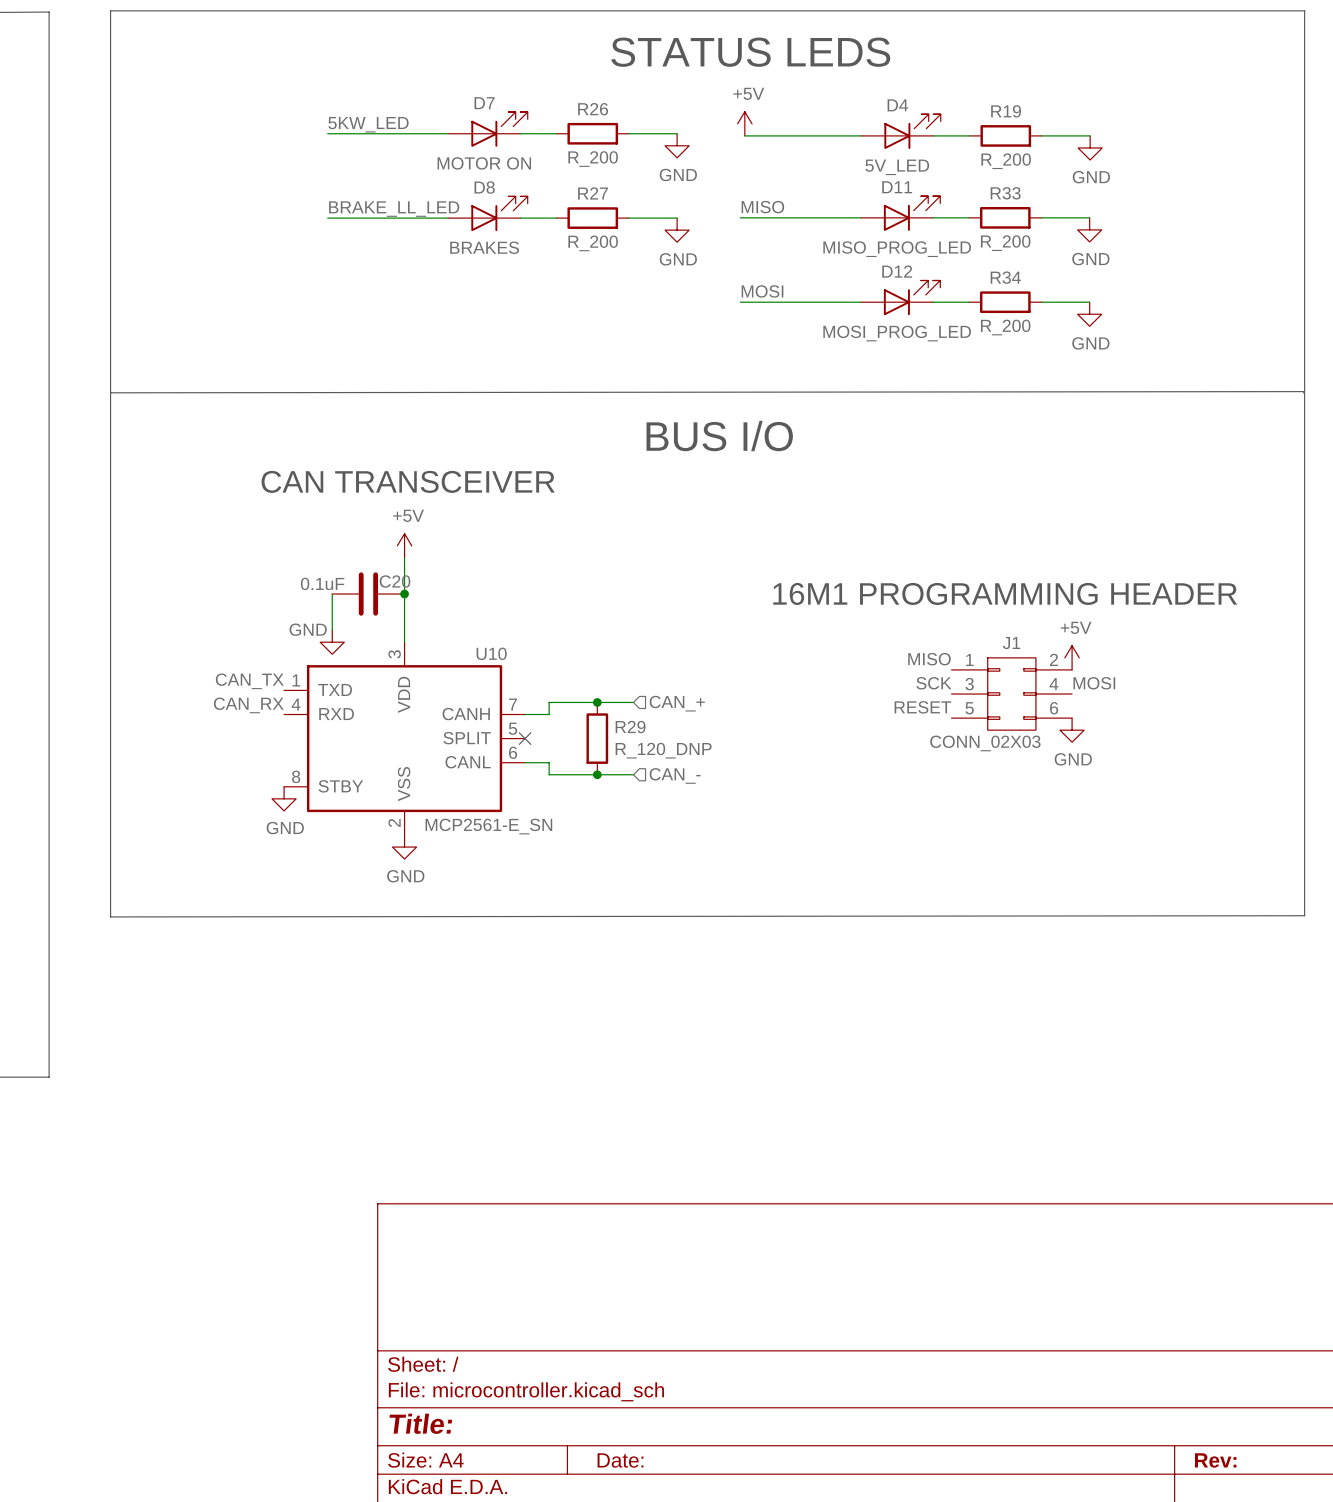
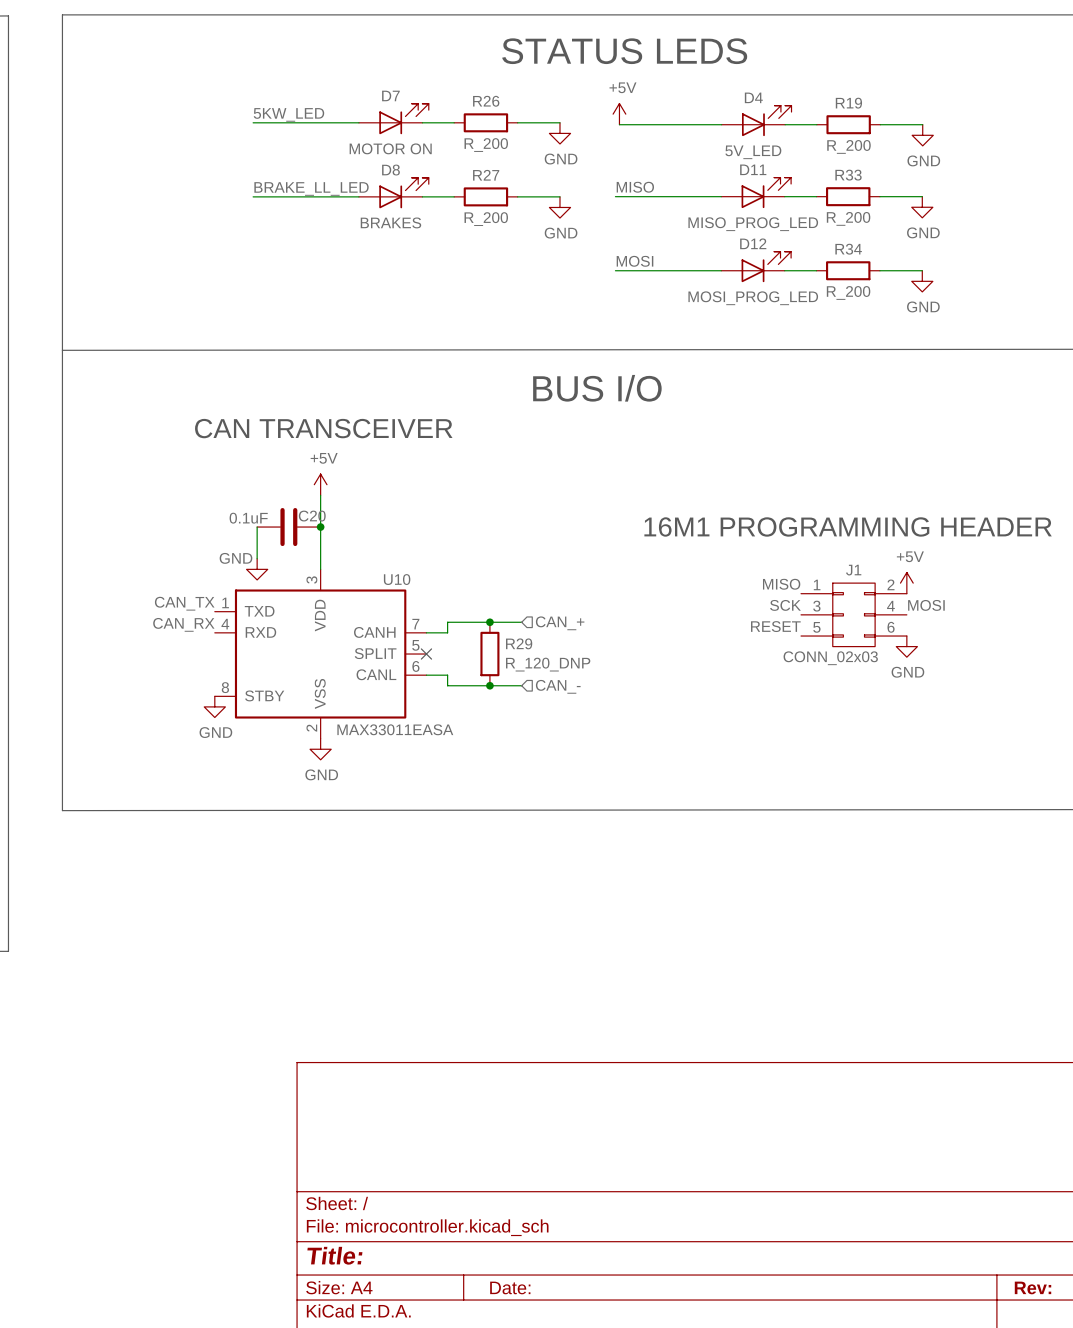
J1 value: CONN_02X03 (985, 743) -> CONN_02x03 (830, 658)
U10 value: MCP2561-E_SN (488, 826) -> MAX33011EASA (395, 729)

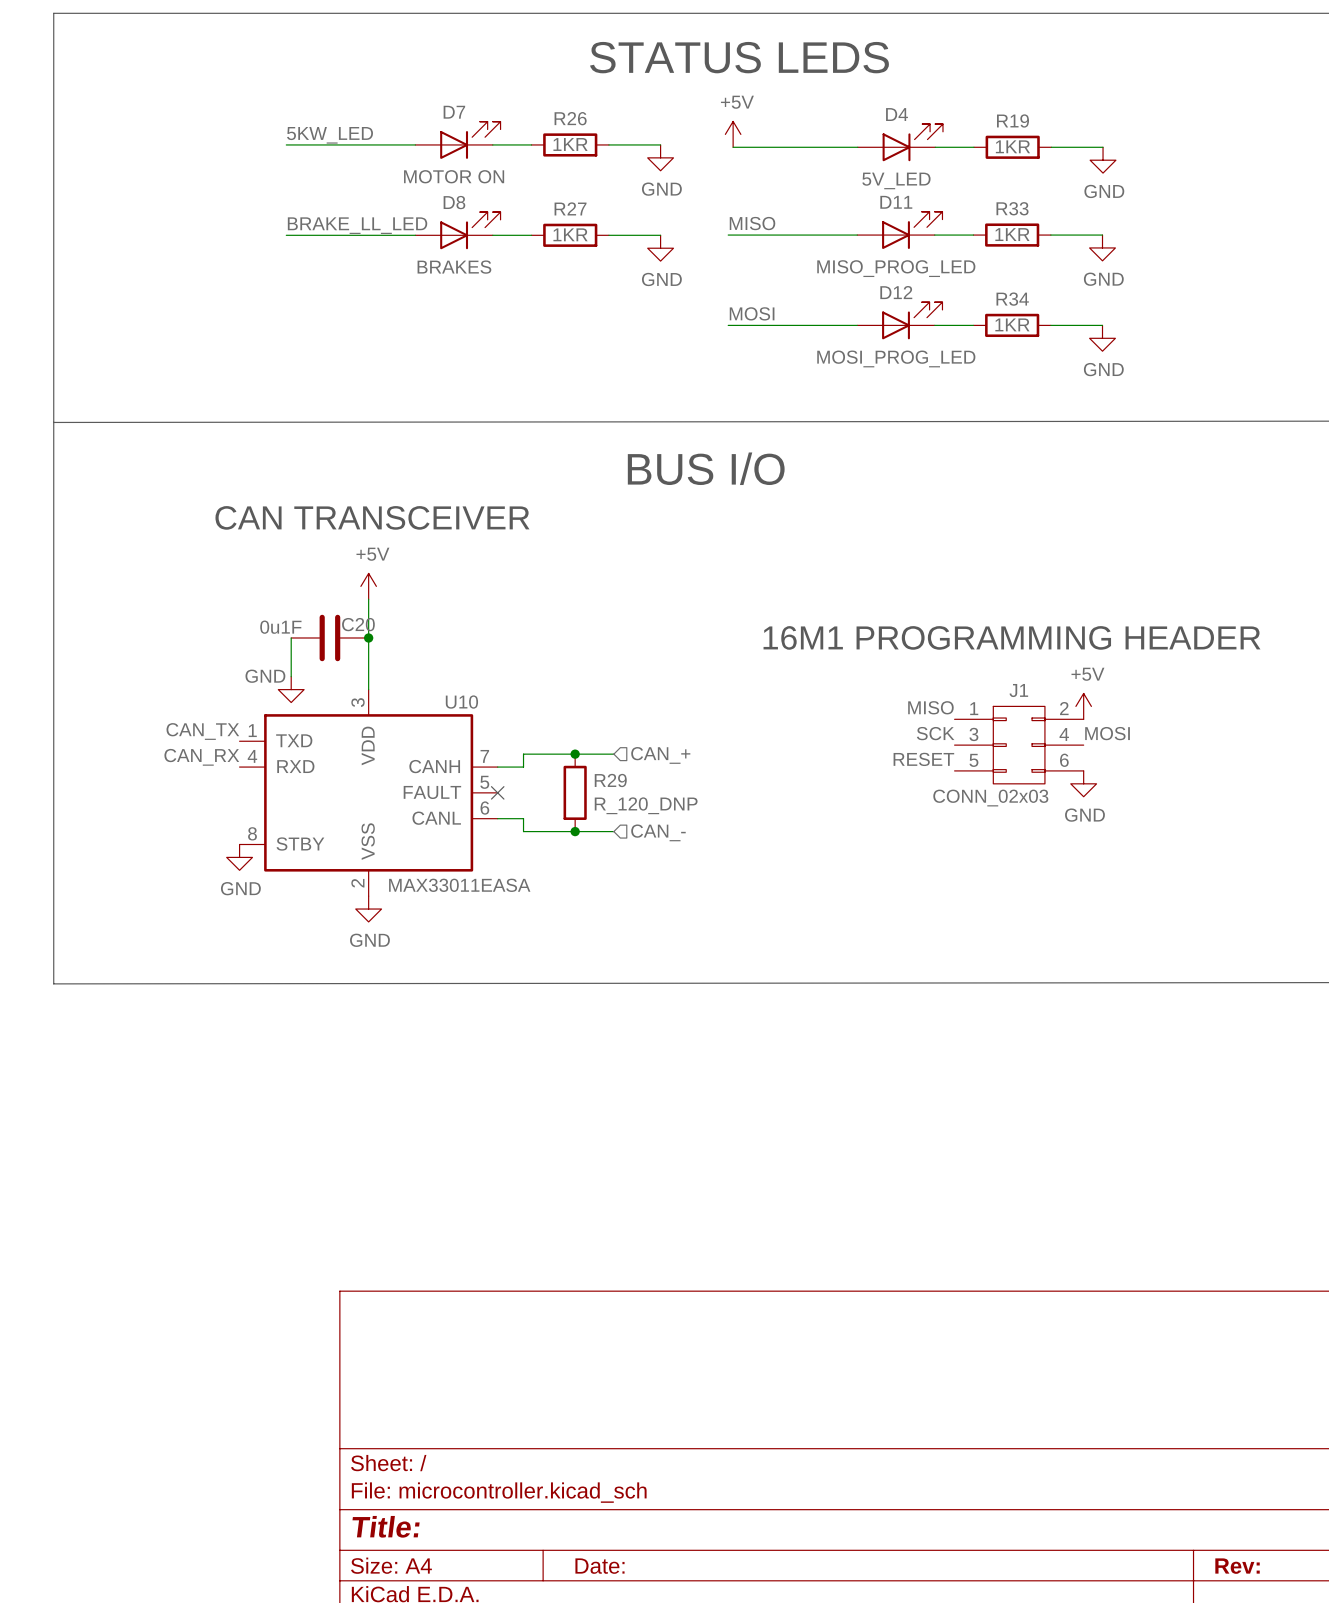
R26 value: R_200 (486, 145) -> 1KR (570, 144)
R19 value: R_200 (848, 146) -> 1KR (1012, 146)
R33 value: R_200 (848, 218) -> 1KR (1012, 234)
R27 value: R_200 (486, 219) -> 1KR (570, 234)
R34 value: R_200 (848, 292) -> 1KR (1012, 324)
C20 value: 0.1uF (248, 518) -> 0u1F (280, 627)
U10 pin name: SPLIT (375, 653) -> FAULT (432, 792)

